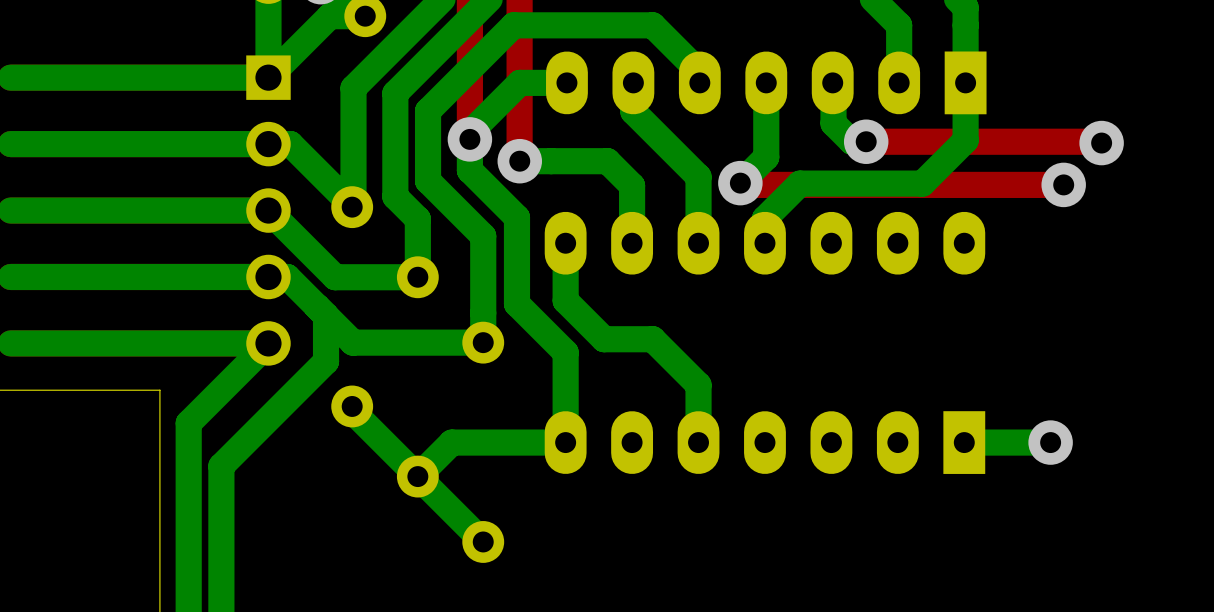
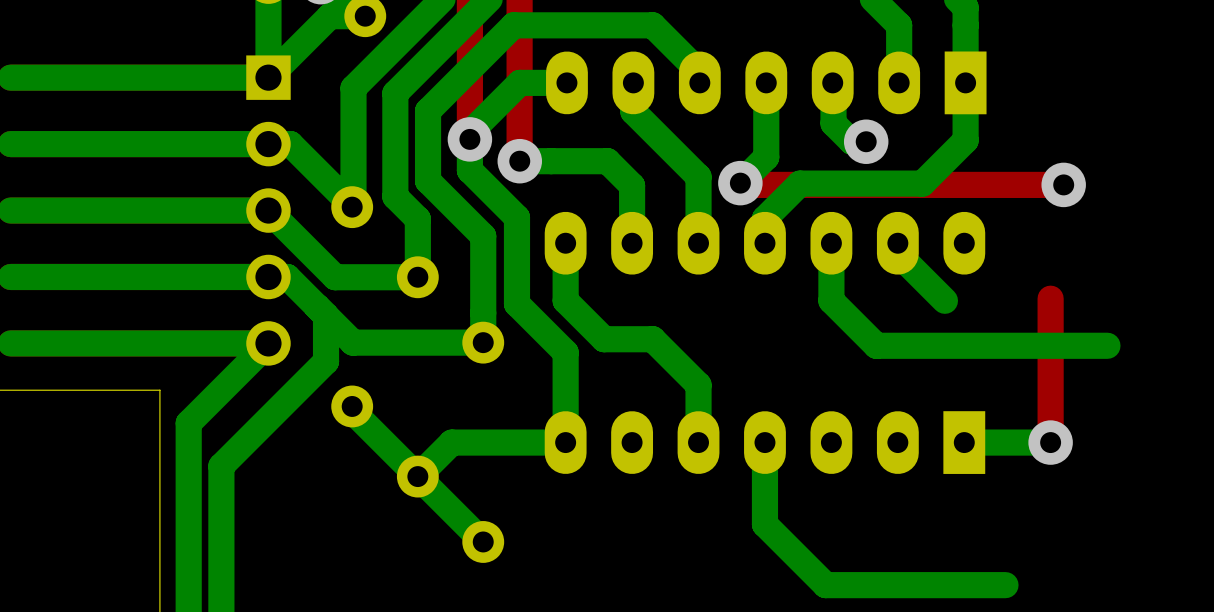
top track: (866, 141) (1101, 143) -> none
via: (1101, 143) -> none
bottom track: none -> (831, 243) (831, 300) (876, 345) (1107, 345)
bottom track: none -> (897, 243) (897, 253) (944, 300)
top track: none -> (1050, 298) (1050, 442)
bottom track: none -> (764, 442) (764, 524) (825, 585) (1005, 585)

